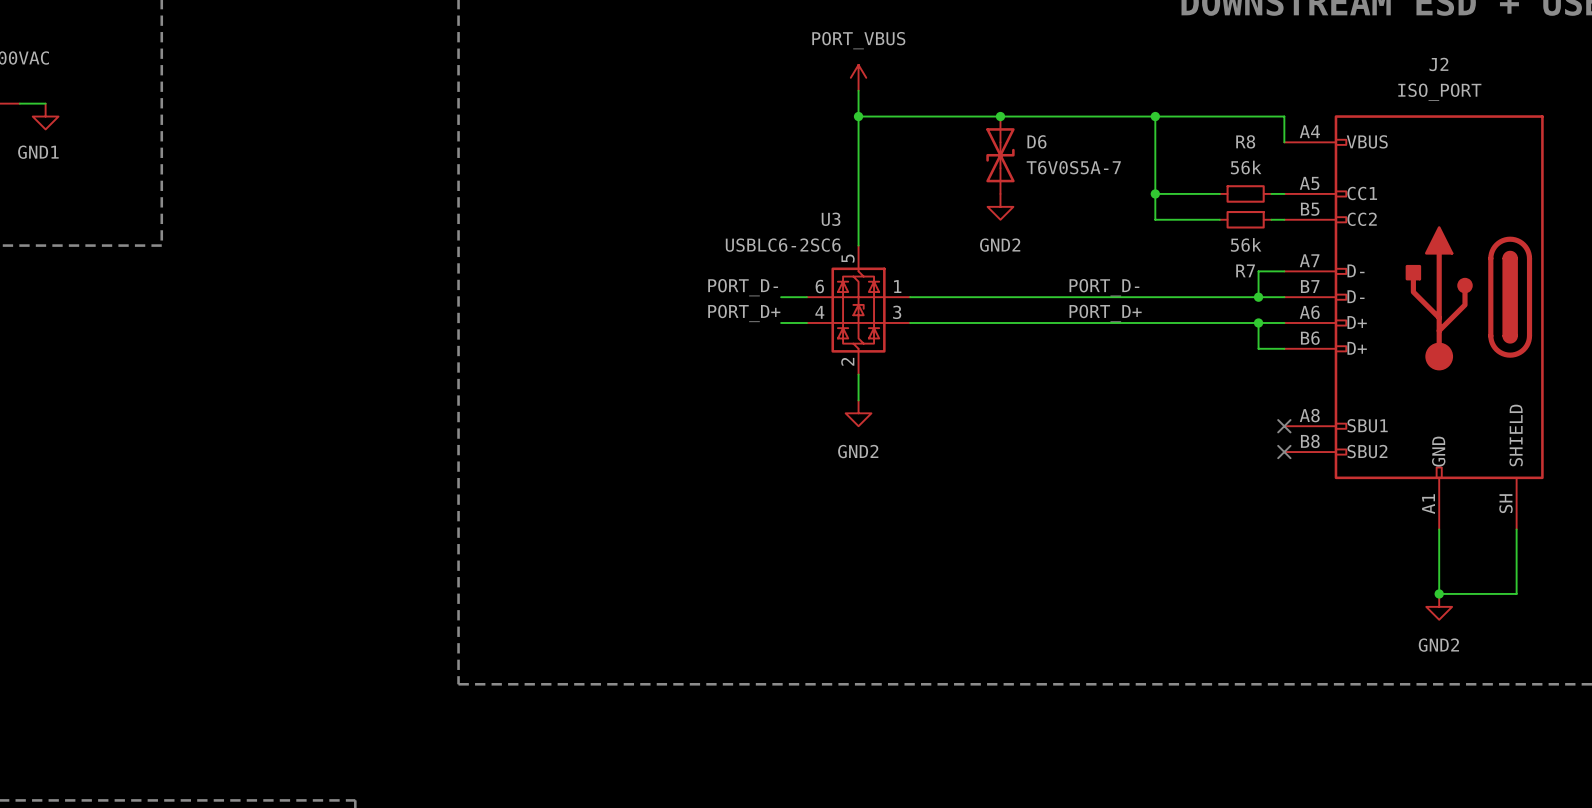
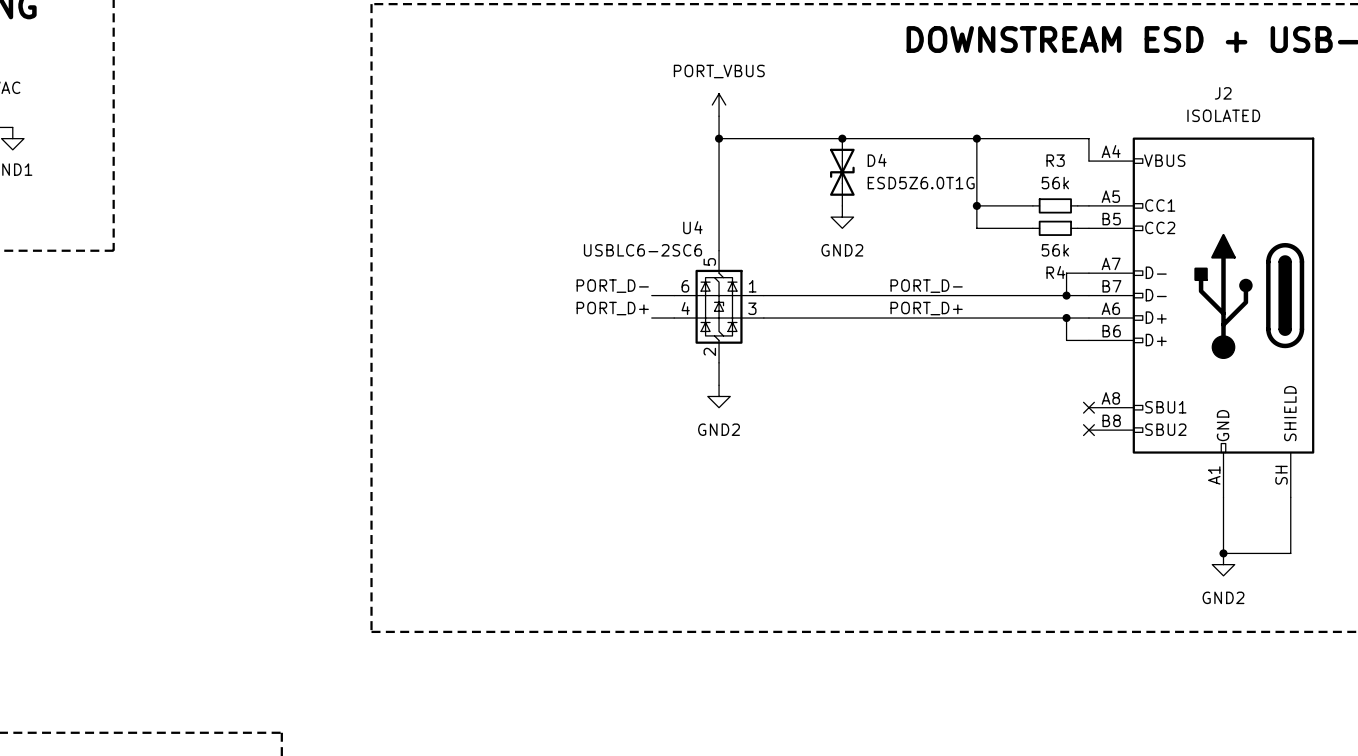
J2 value: ISO_PORT (1439, 92) -> ISOLATED (1223, 115)
D6 name: D6 (1036, 141) -> D4 (877, 160)
R8 name: R8 (1245, 141) -> R3 (1055, 160)
D6 value: T6V0S5A-7 (1073, 167) -> ESD5Z6.0T1G (921, 183)
U3 name: U3 (831, 219) -> U4 (692, 227)
R7 name: R7 (1245, 270) -> R4 (1055, 272)

